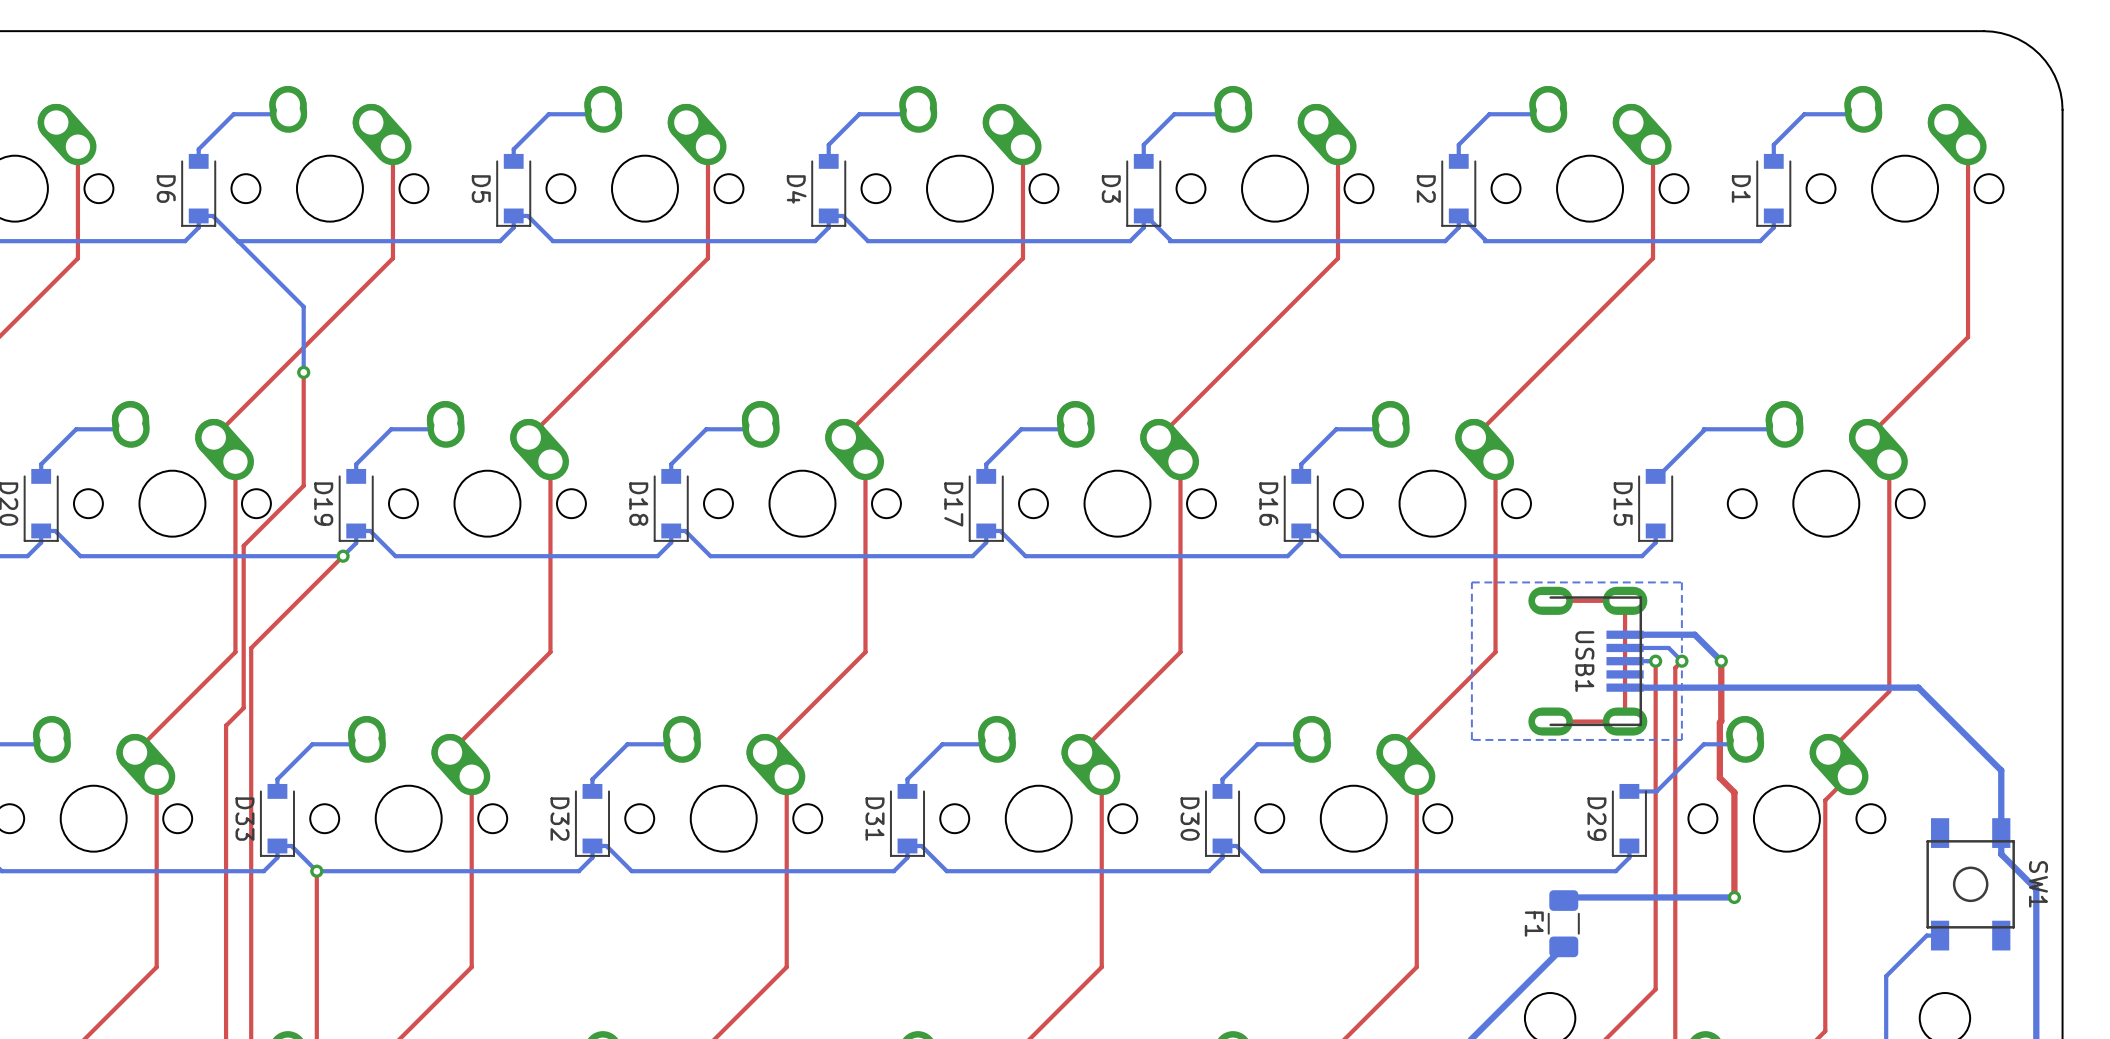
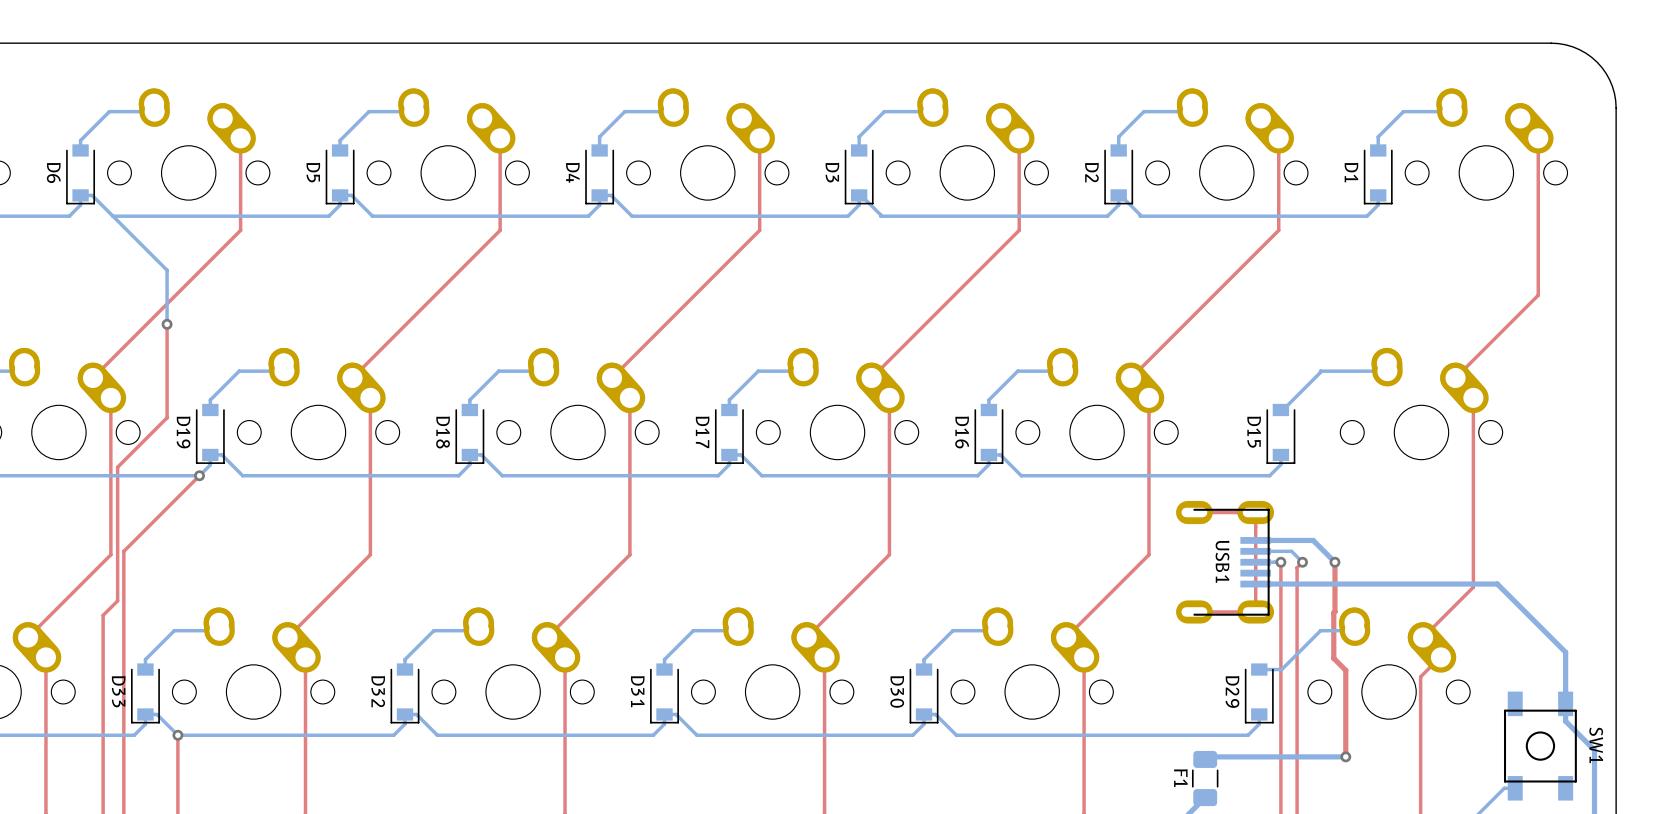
bottom zone outline: (1681, 582) (1681, 739) (1471, 739) (1471, 582) (1681, 582) -> none

